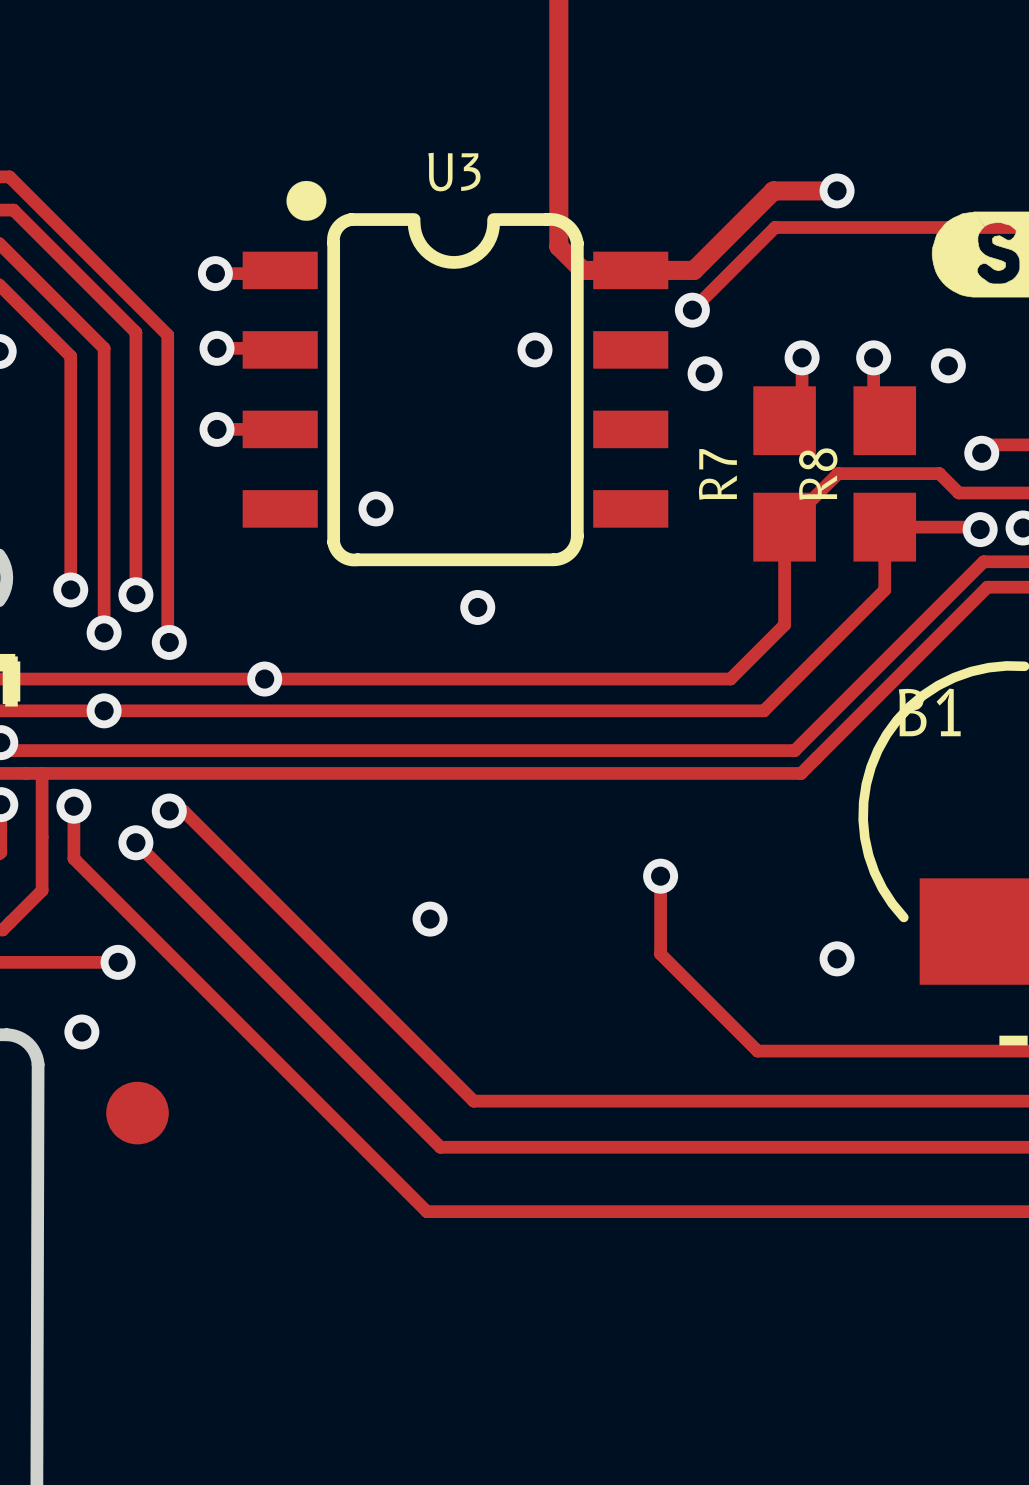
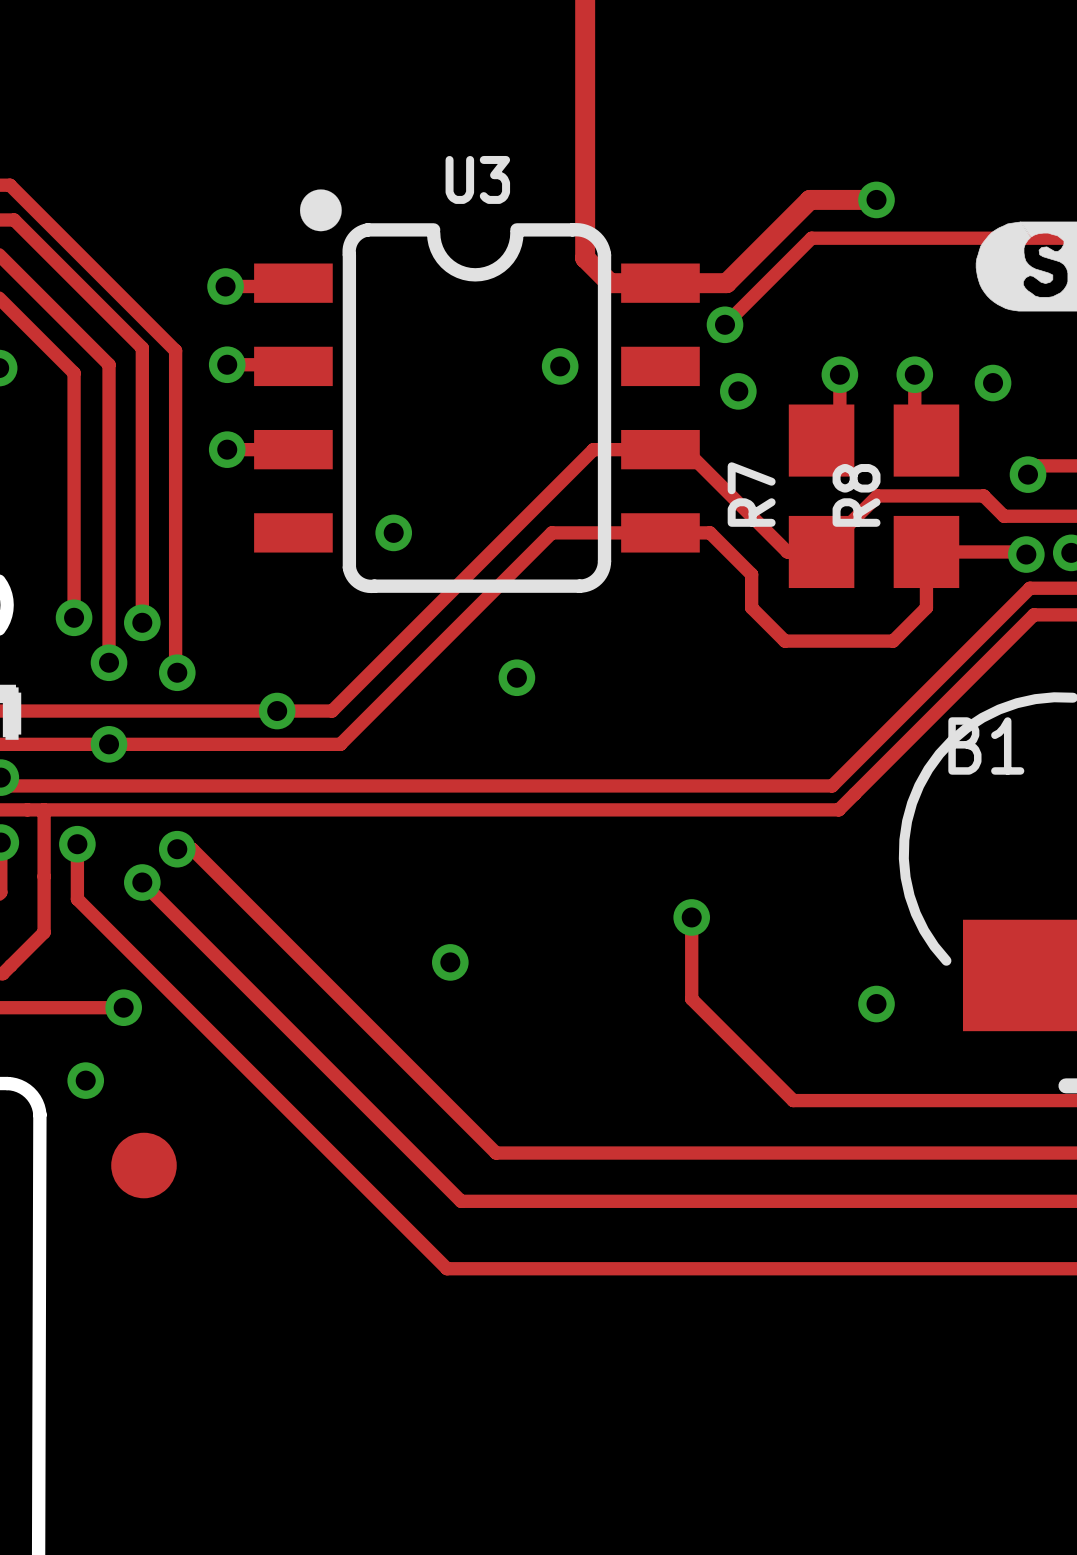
track: (784, 527) (784, 624) (730, 679) (317, 679) -> (821, 551) (787, 551) (685, 449) (593, 449) (332, 711)
track: (884, 580) (884, 589) (763, 710) (325, 710) -> (926, 607) (893, 641) (784, 641) (751, 607) (751, 574) (710, 532) (551, 532) (340, 744)
via position: (477, 607) -> (516, 677)

